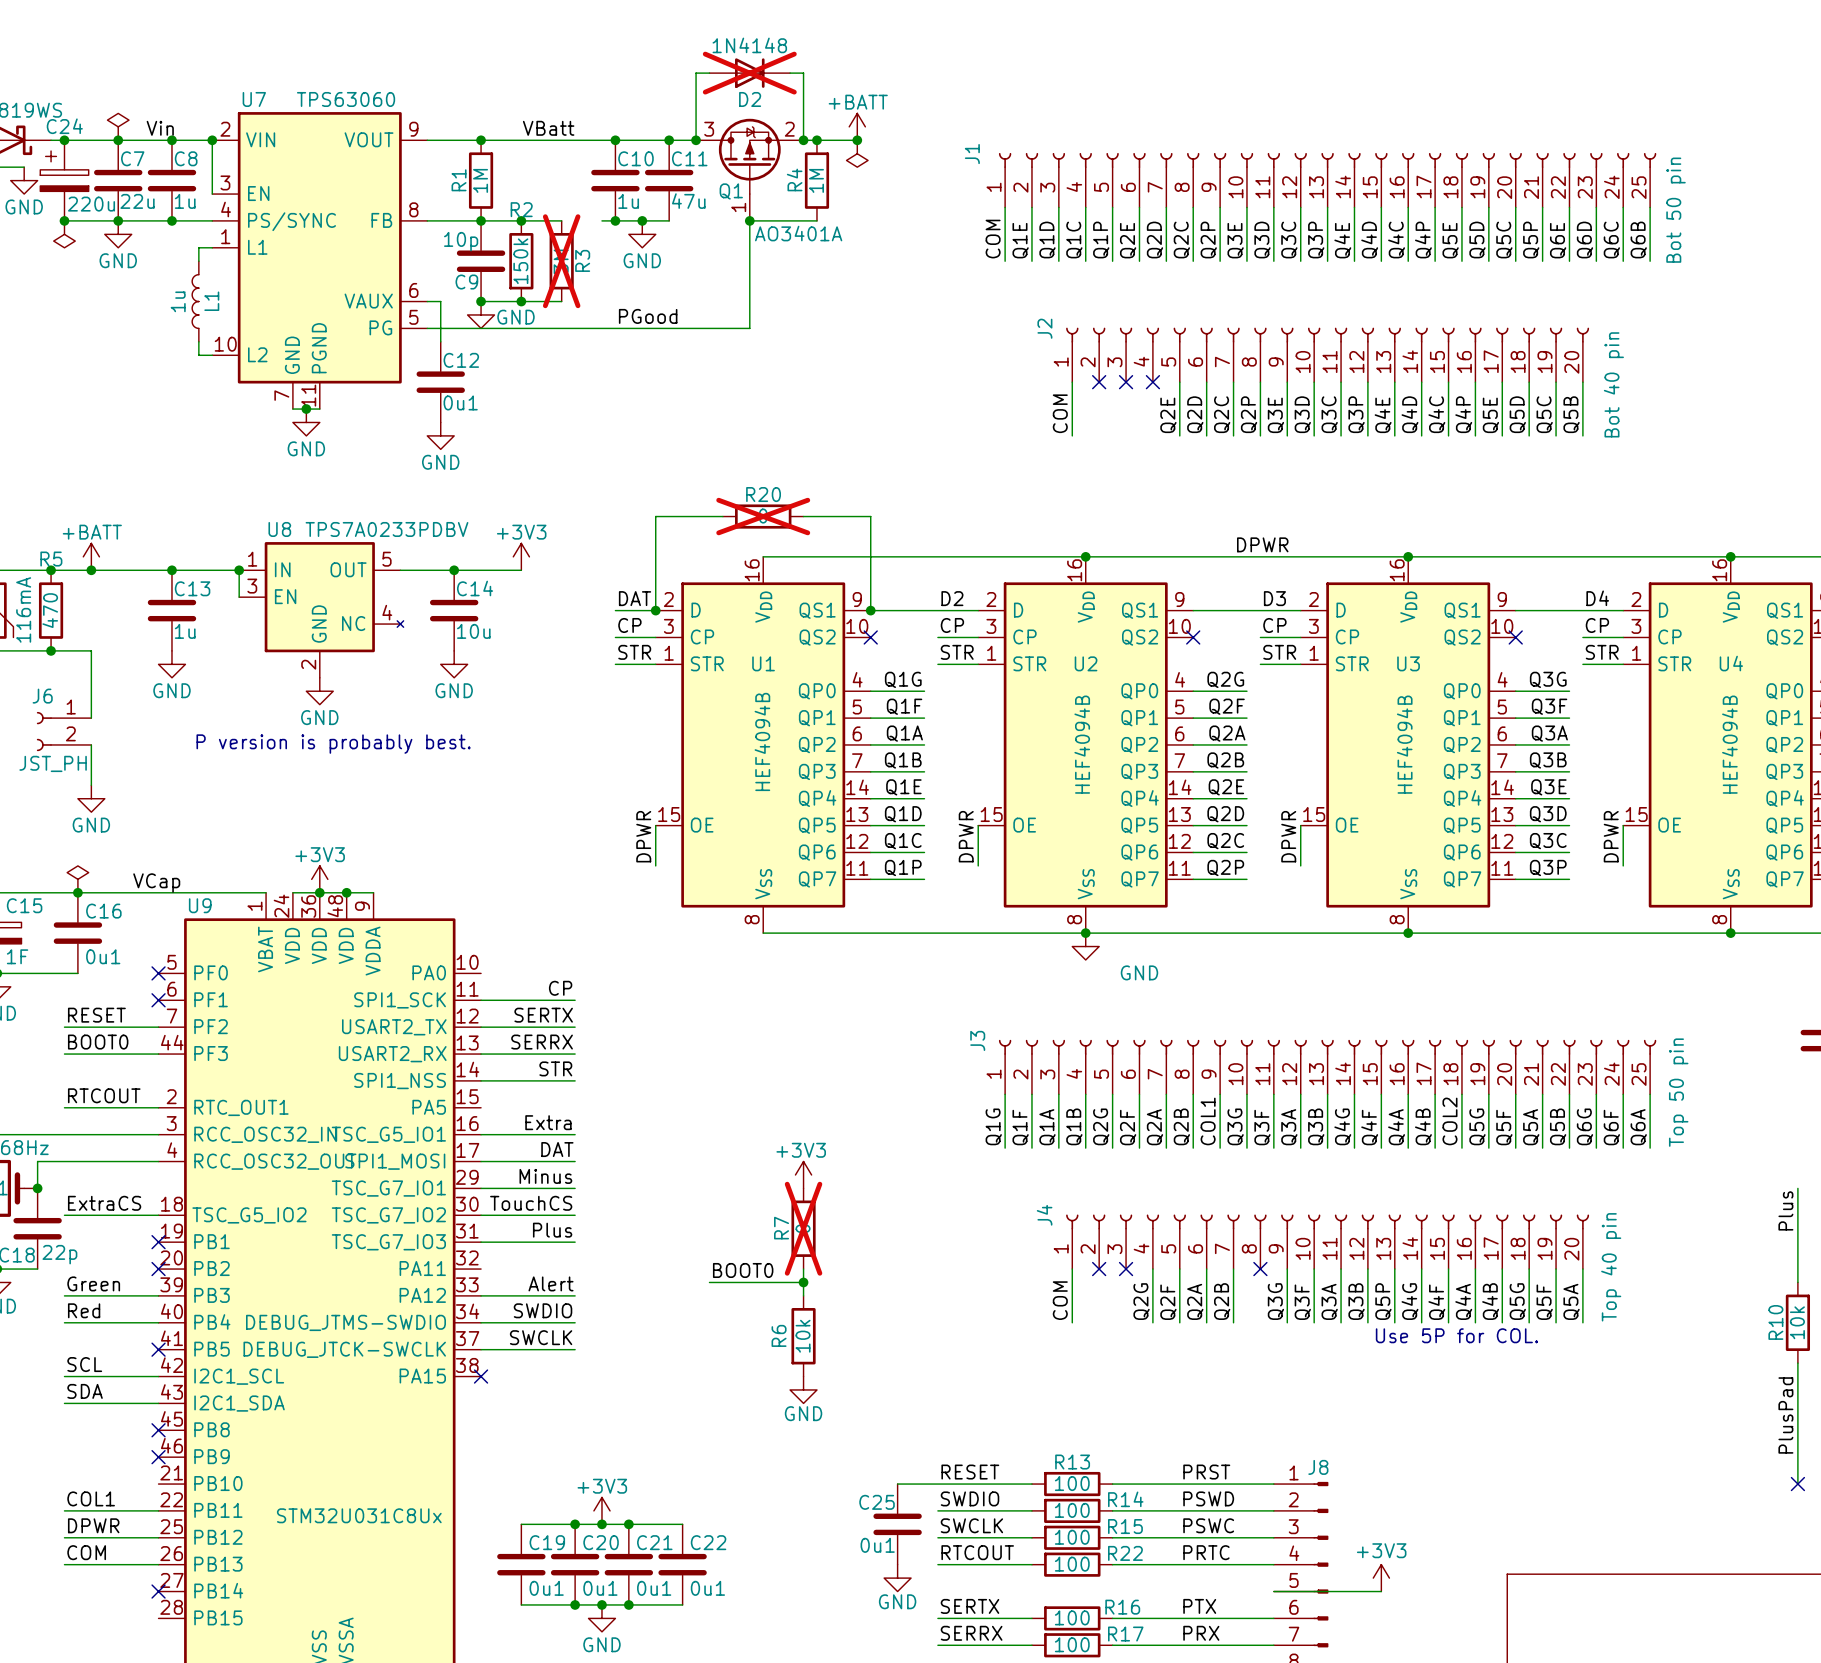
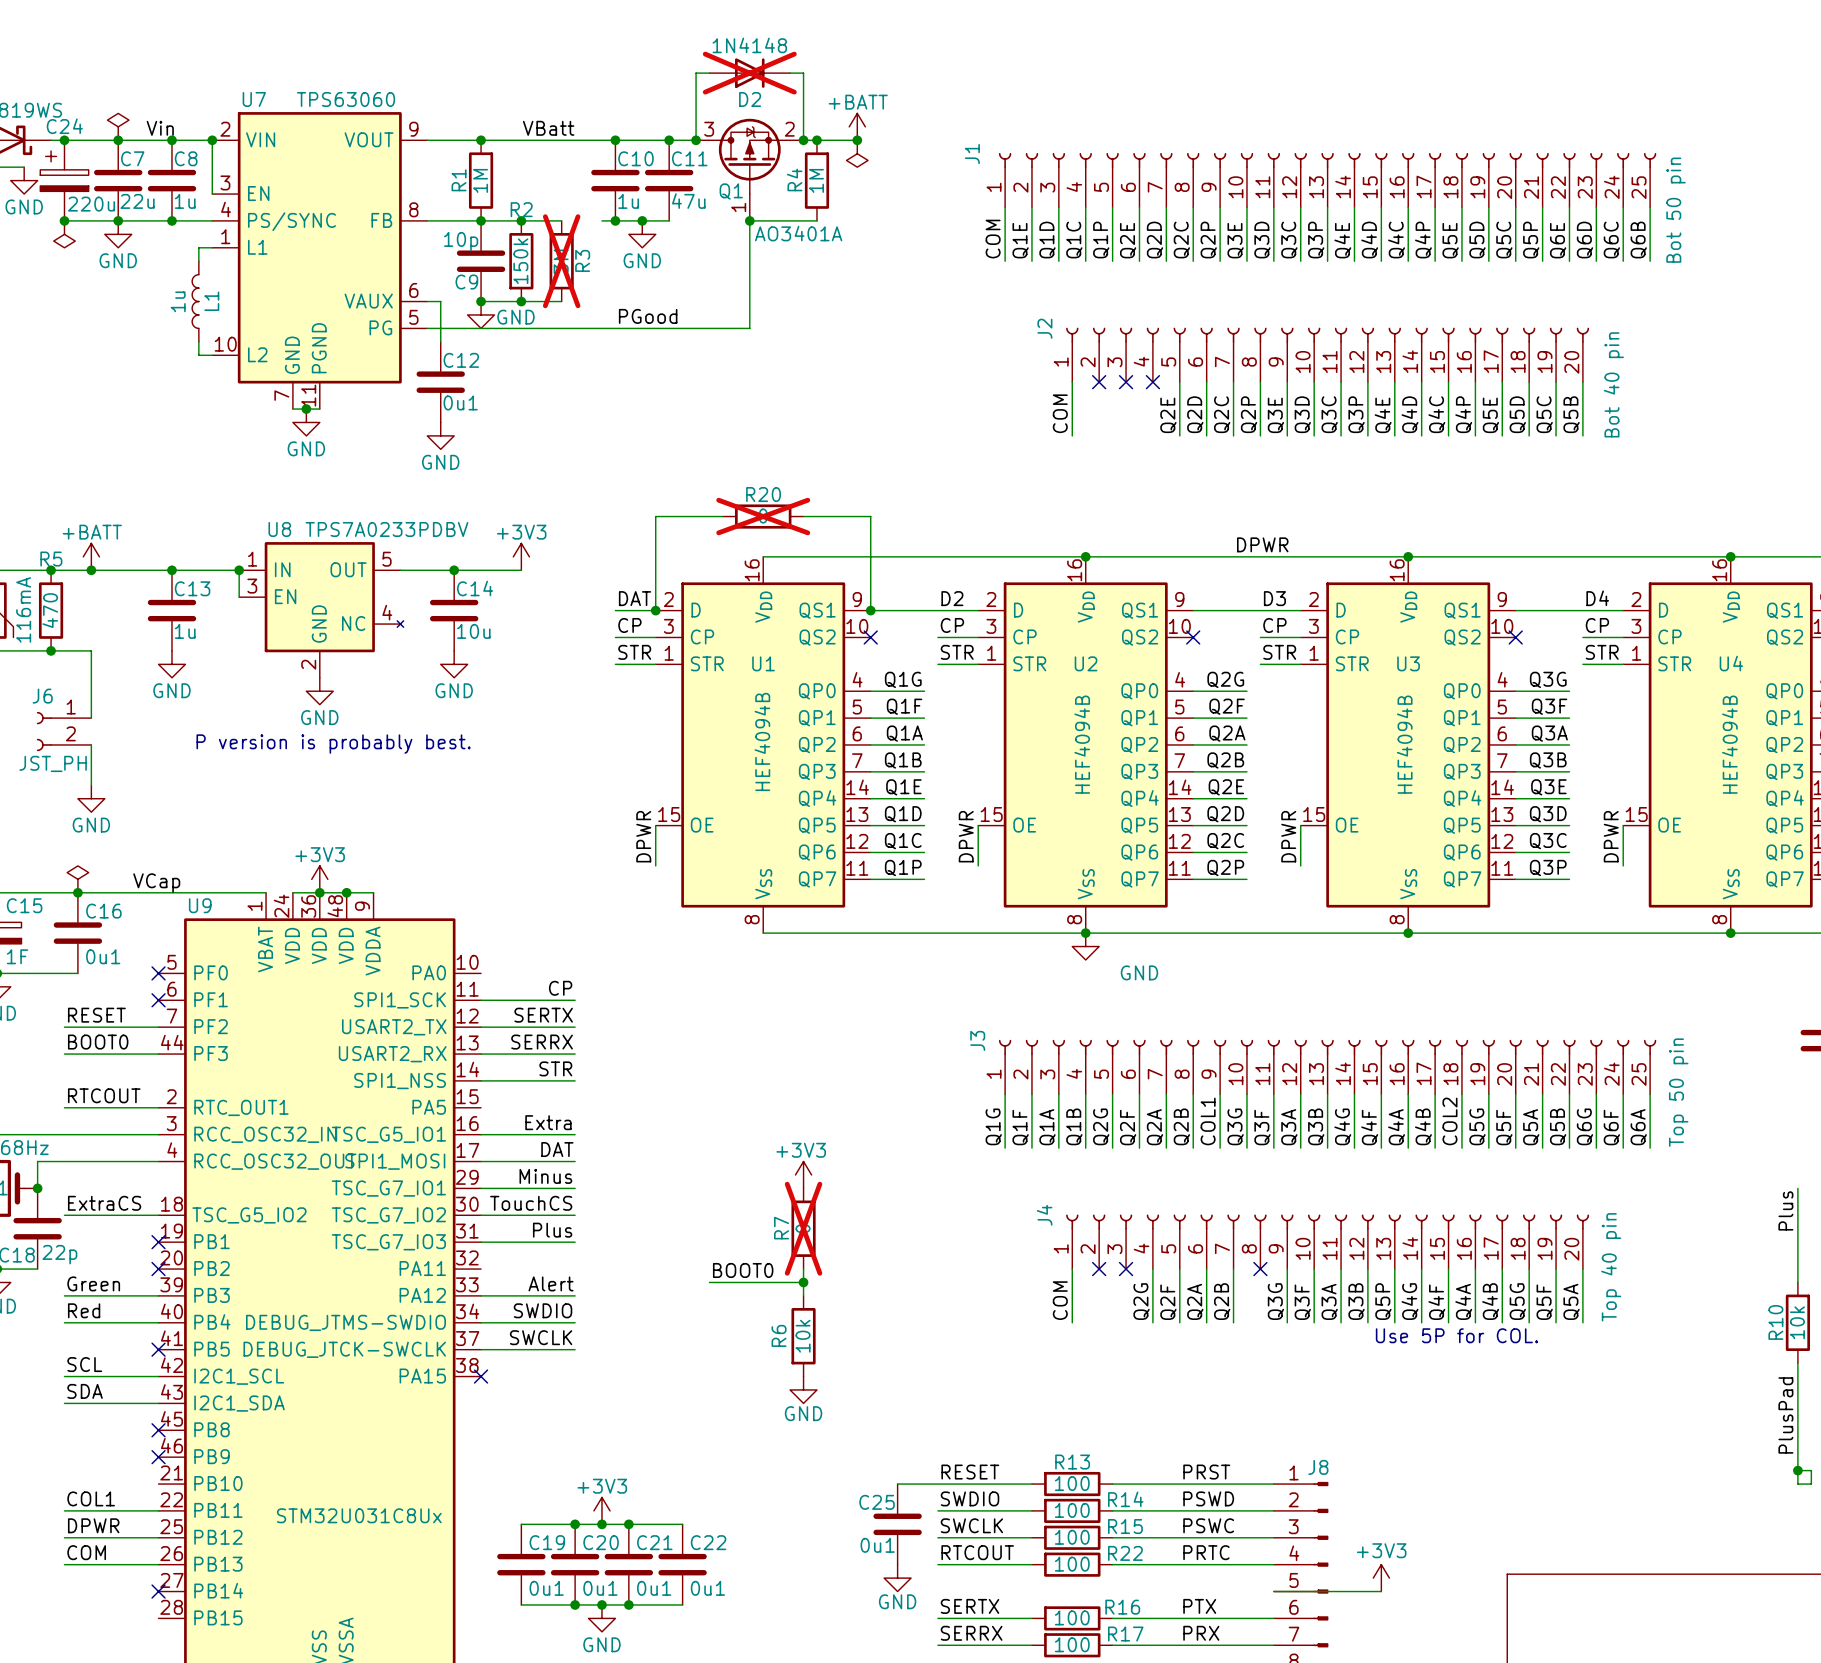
wire: none -> (1797, 1470) (1811, 1470) (1811, 1484) (1797, 1484)
junction: none -> (1797, 1470)
no-connect mark: (1797, 1484) -> none

